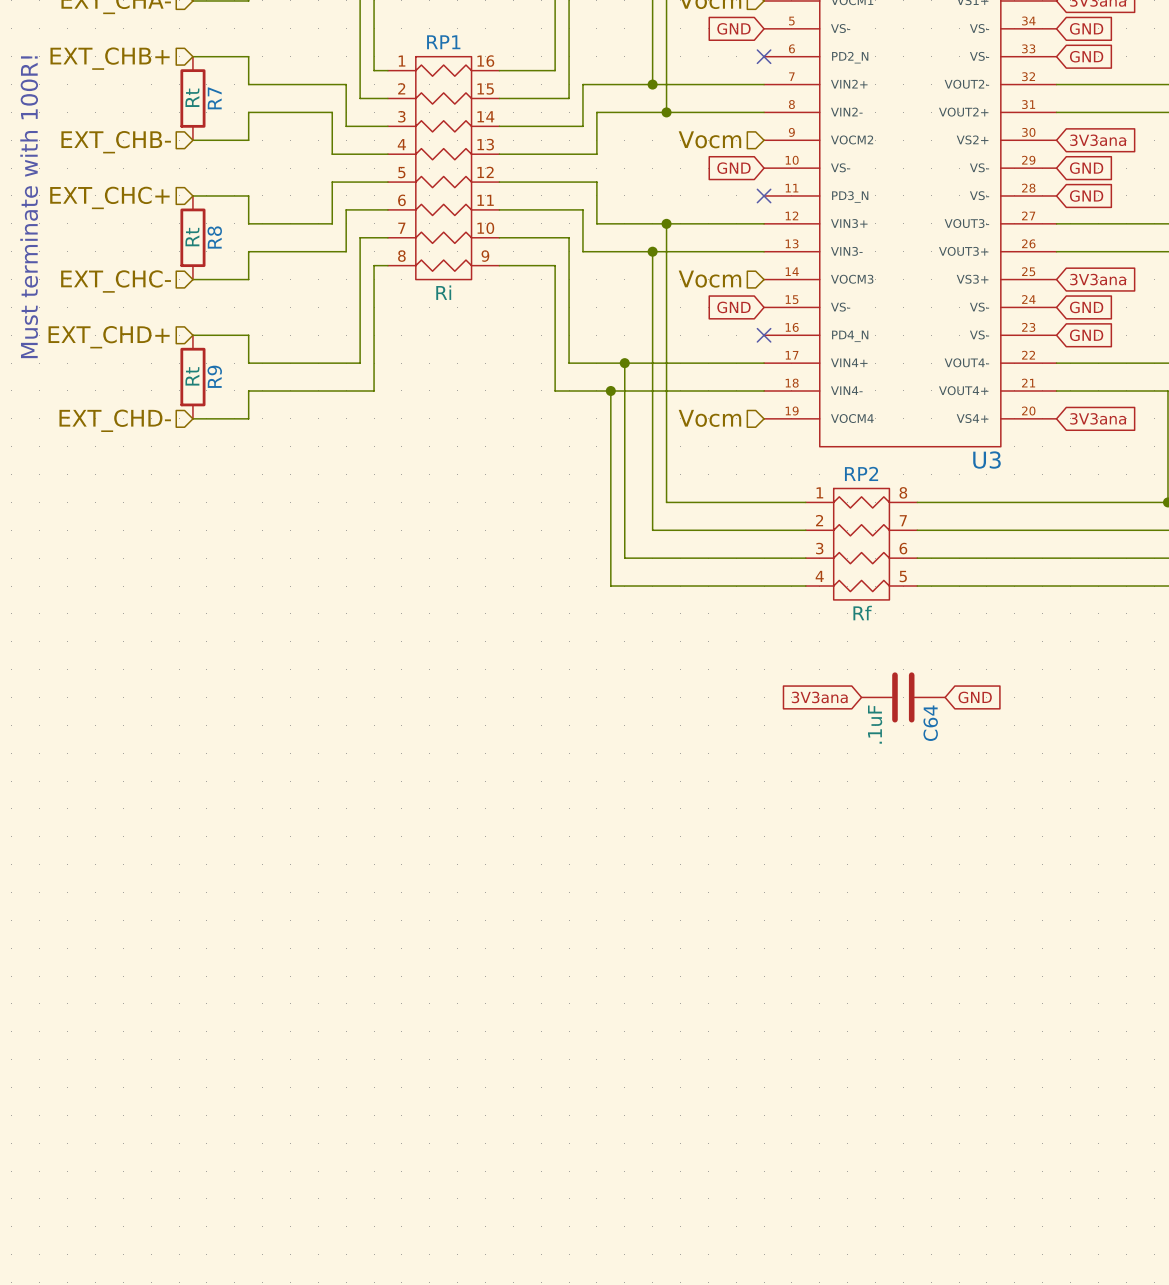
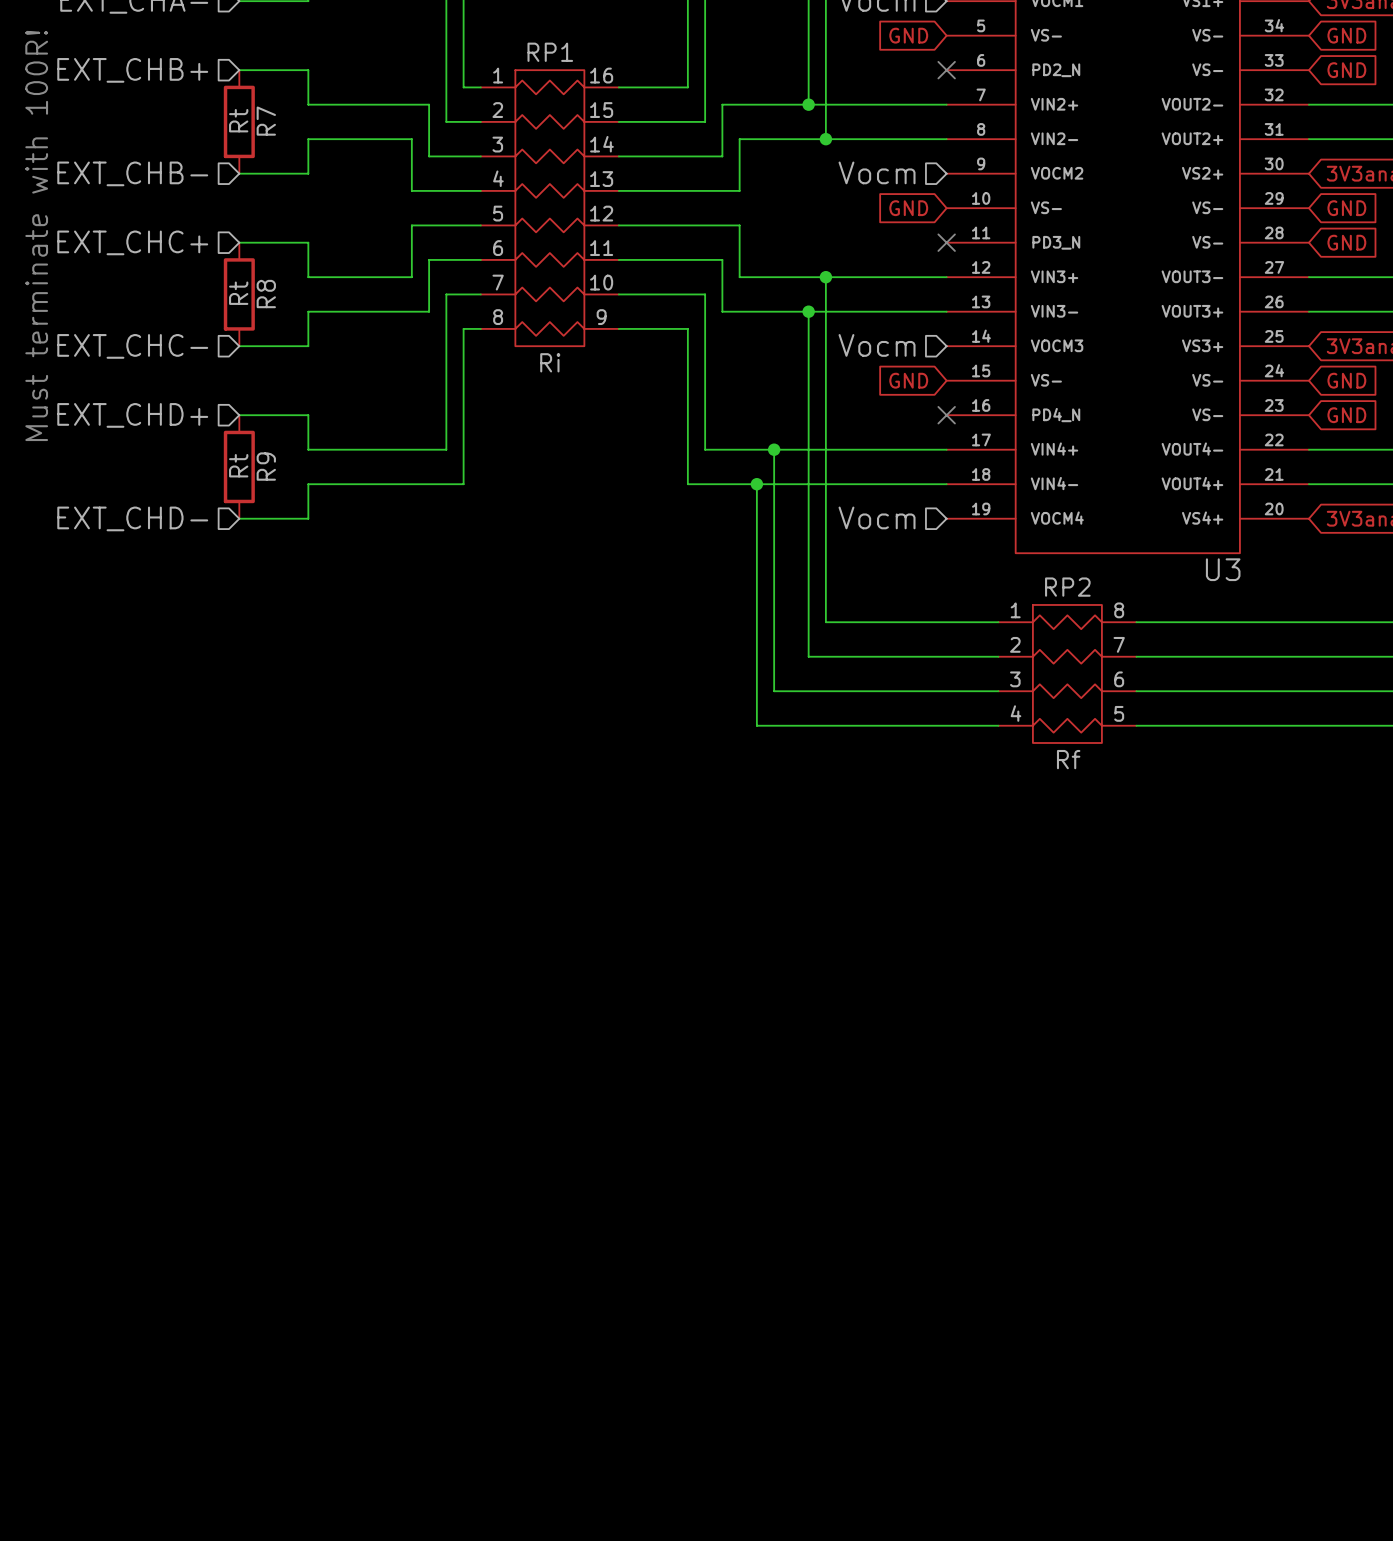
global label: 3V3ana (819, 697) -> none
C64: .1uF (903, 697) -> none
global label: GND (975, 697) -> none

